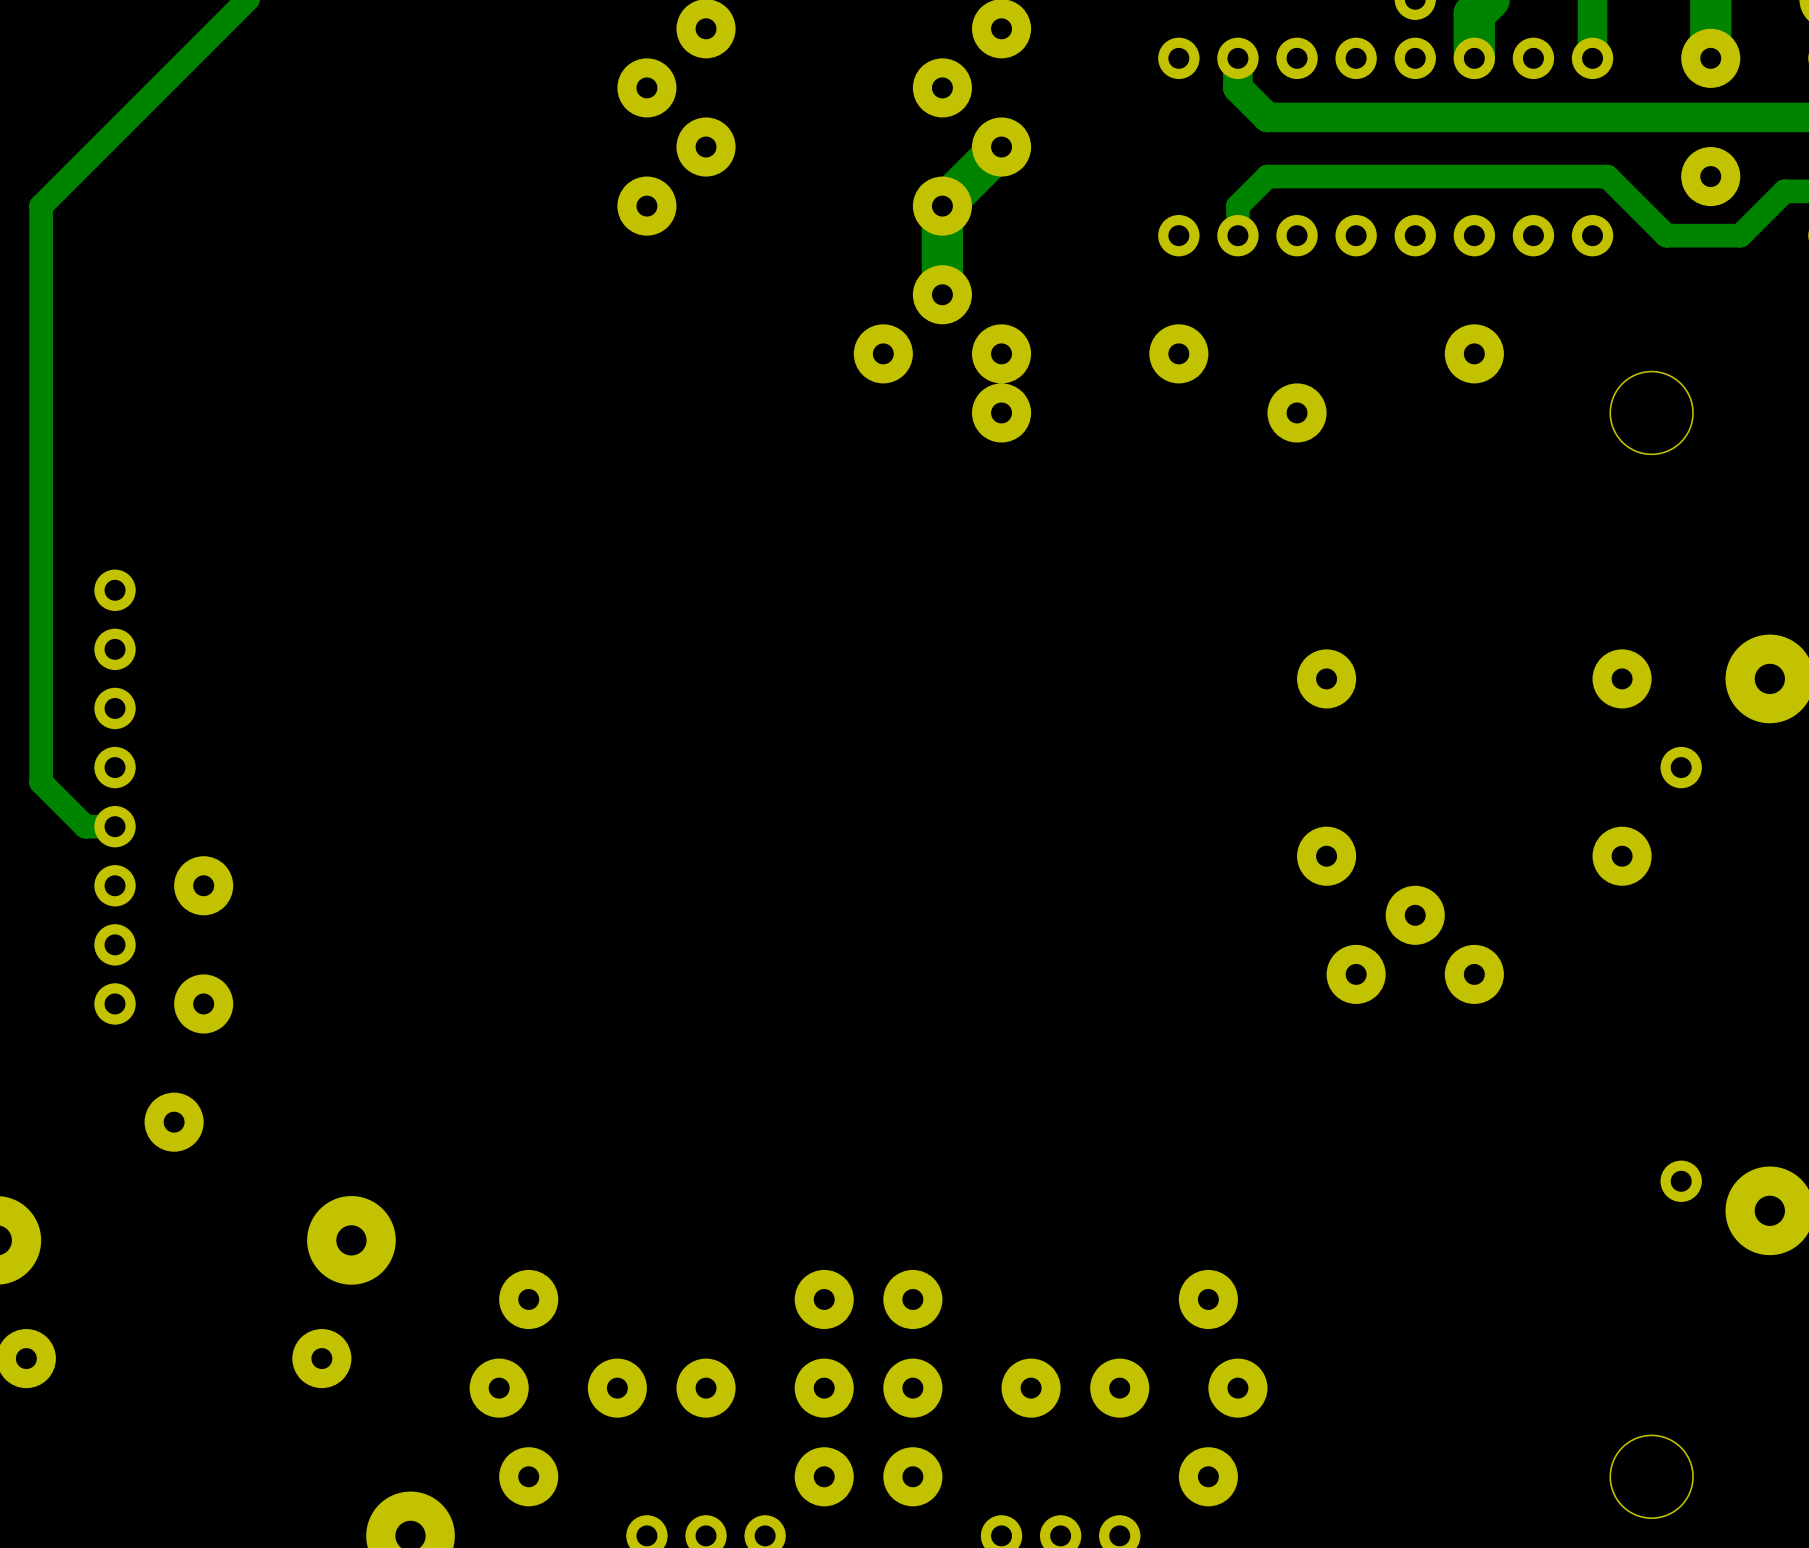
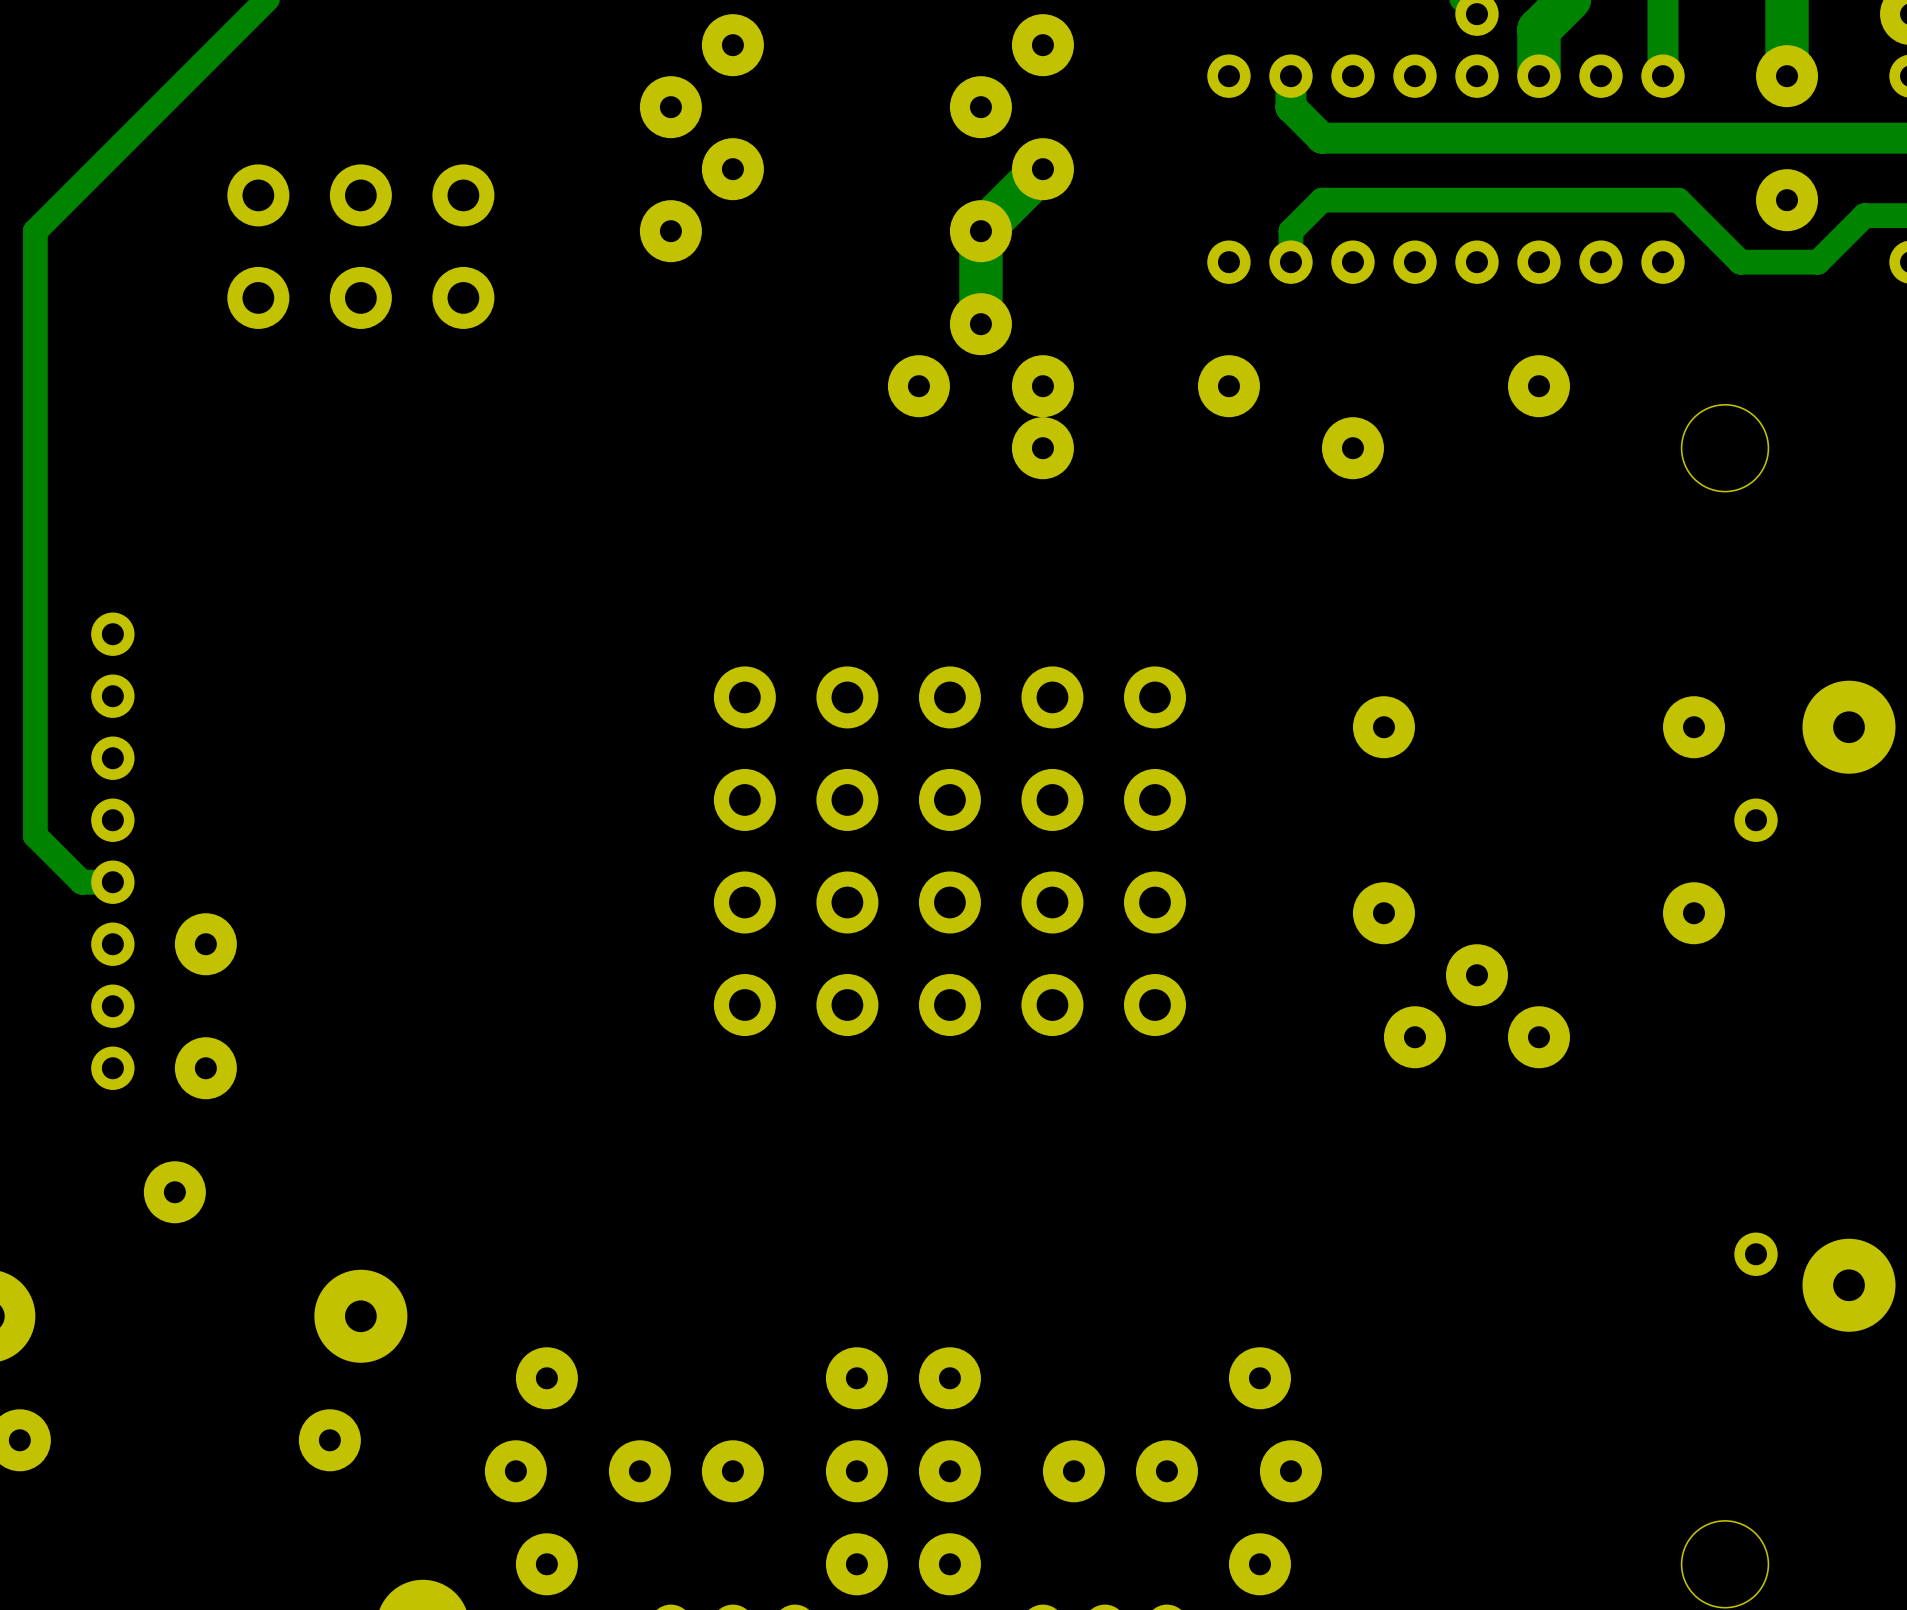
part: none -> (360, 246)
part: none -> (949, 851)

